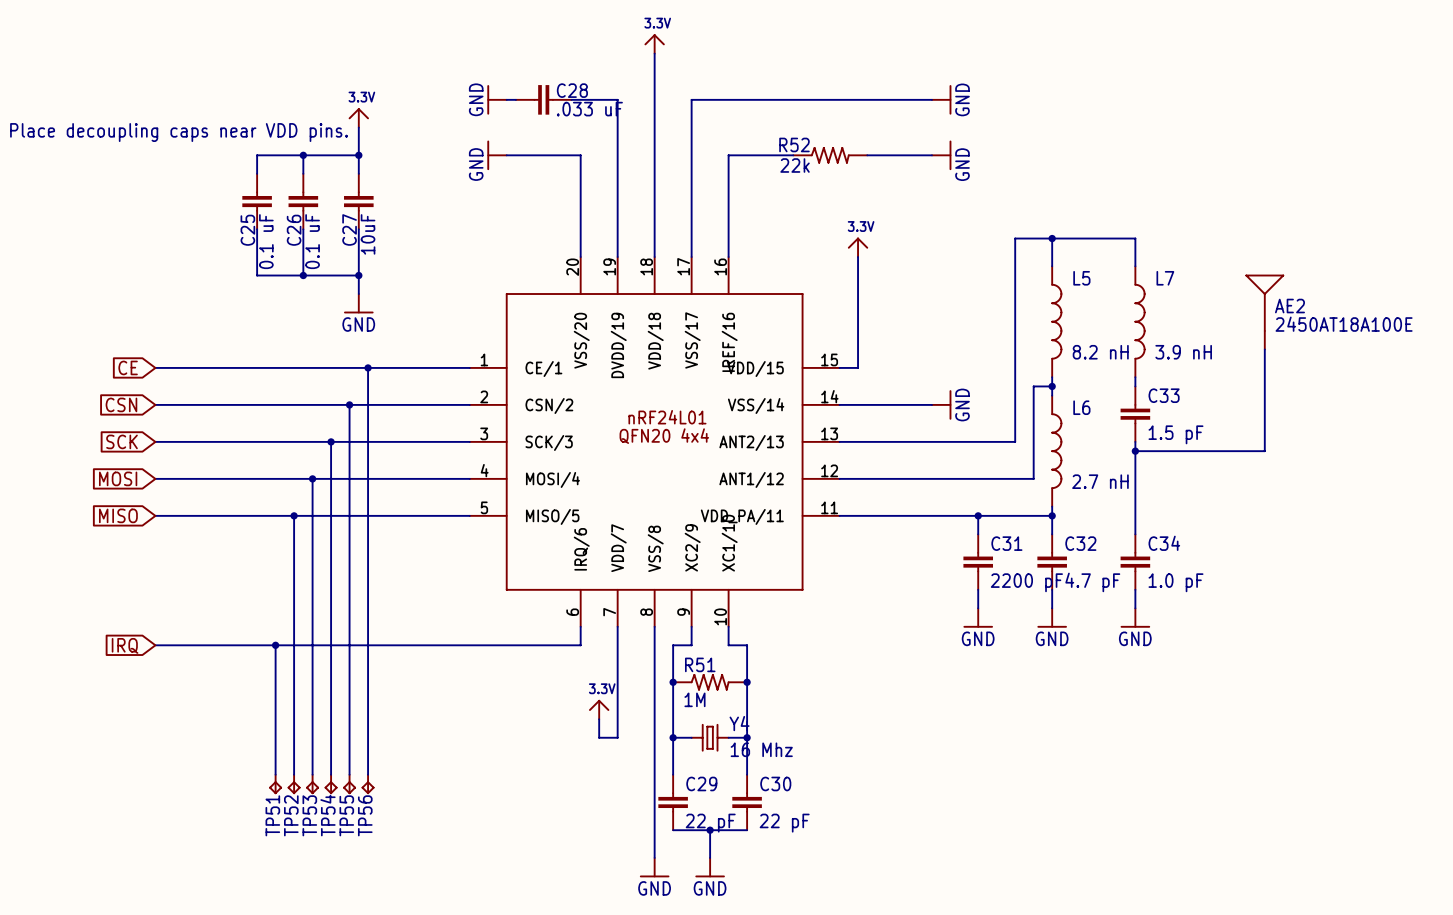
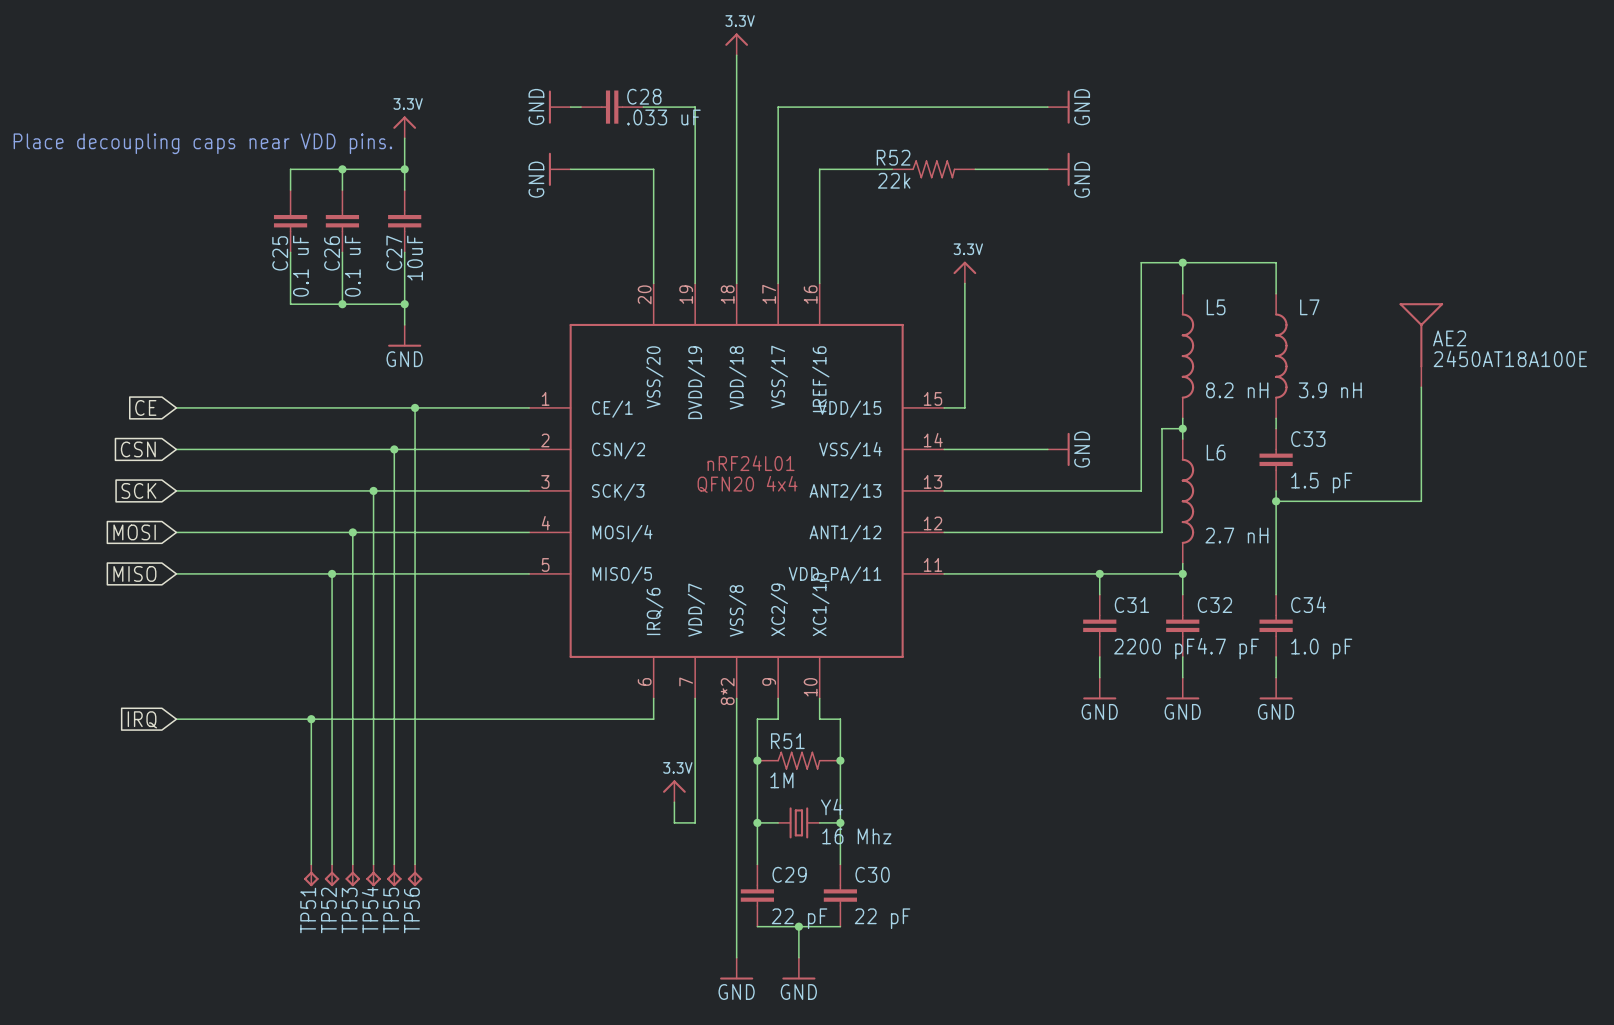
part pin number: 8 (646, 612) -> 8*2 (727, 691)

